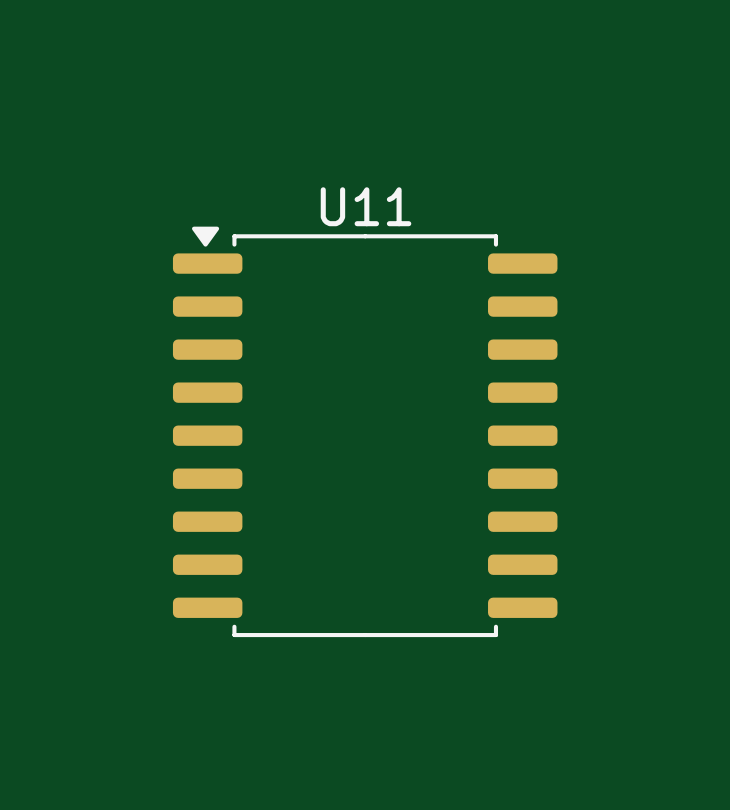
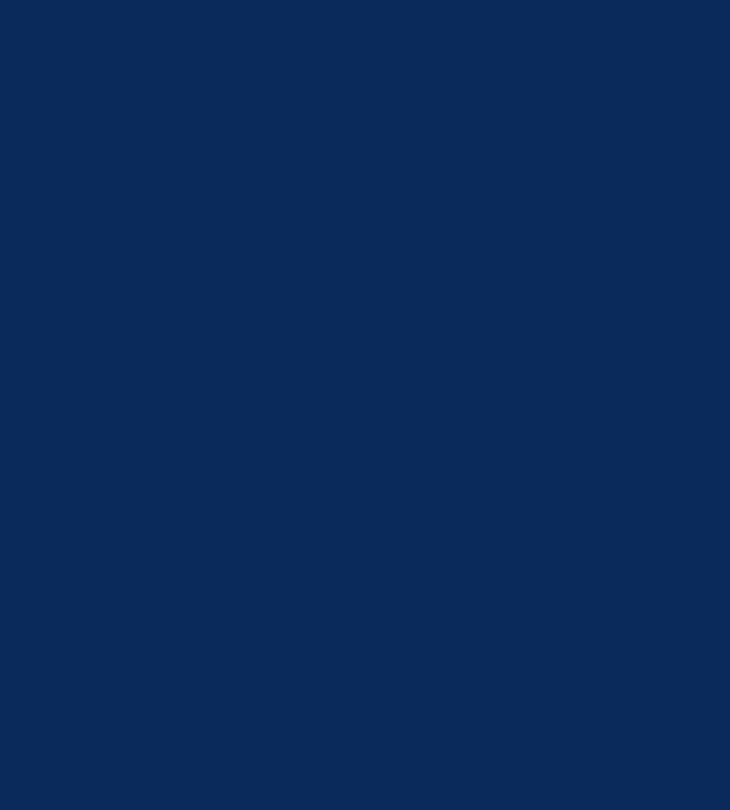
U11: (365, 431) -> none

